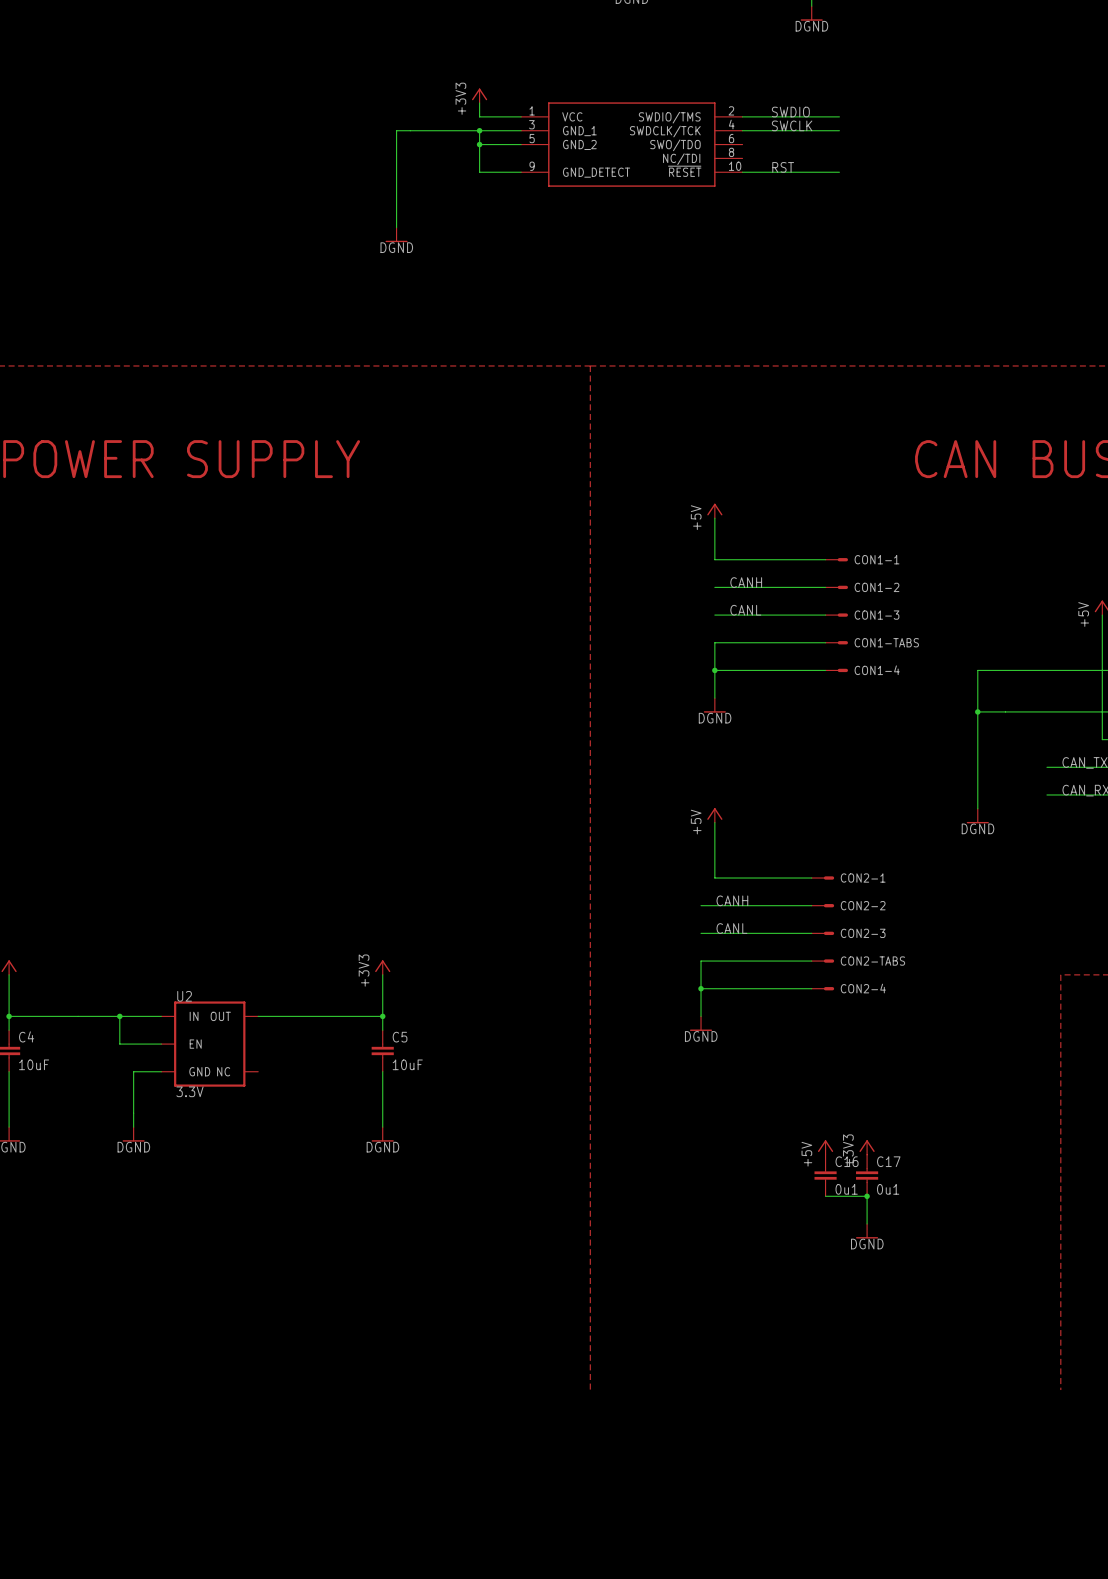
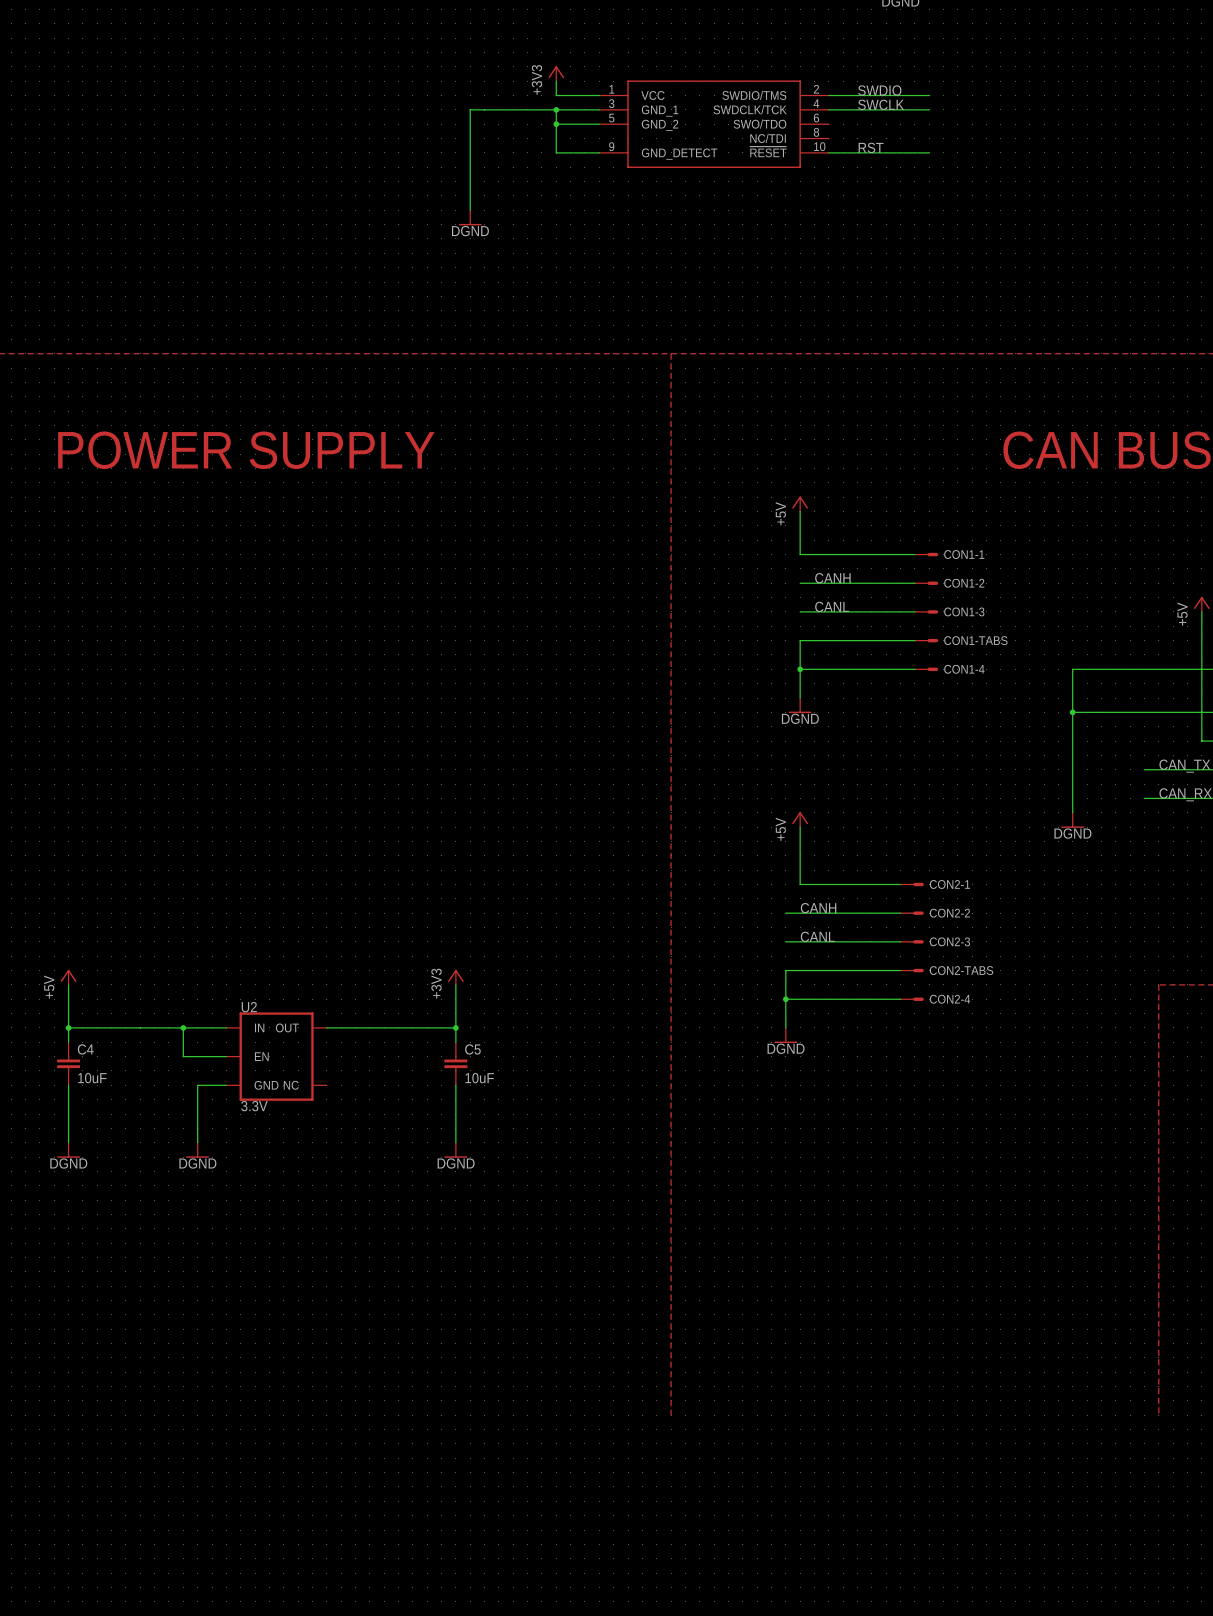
power symbol: +5V (825, 1147) -> none
power symbol: +3V3 (867, 1147) -> none
C16: 0u1 (825, 1175) -> none
C17: 0u1 (867, 1175) -> none
wire: (825, 1196) (867, 1196) (867, 1223) -> none
junction: (867, 1196) -> none
power symbol: DGND (867, 1231) -> none

